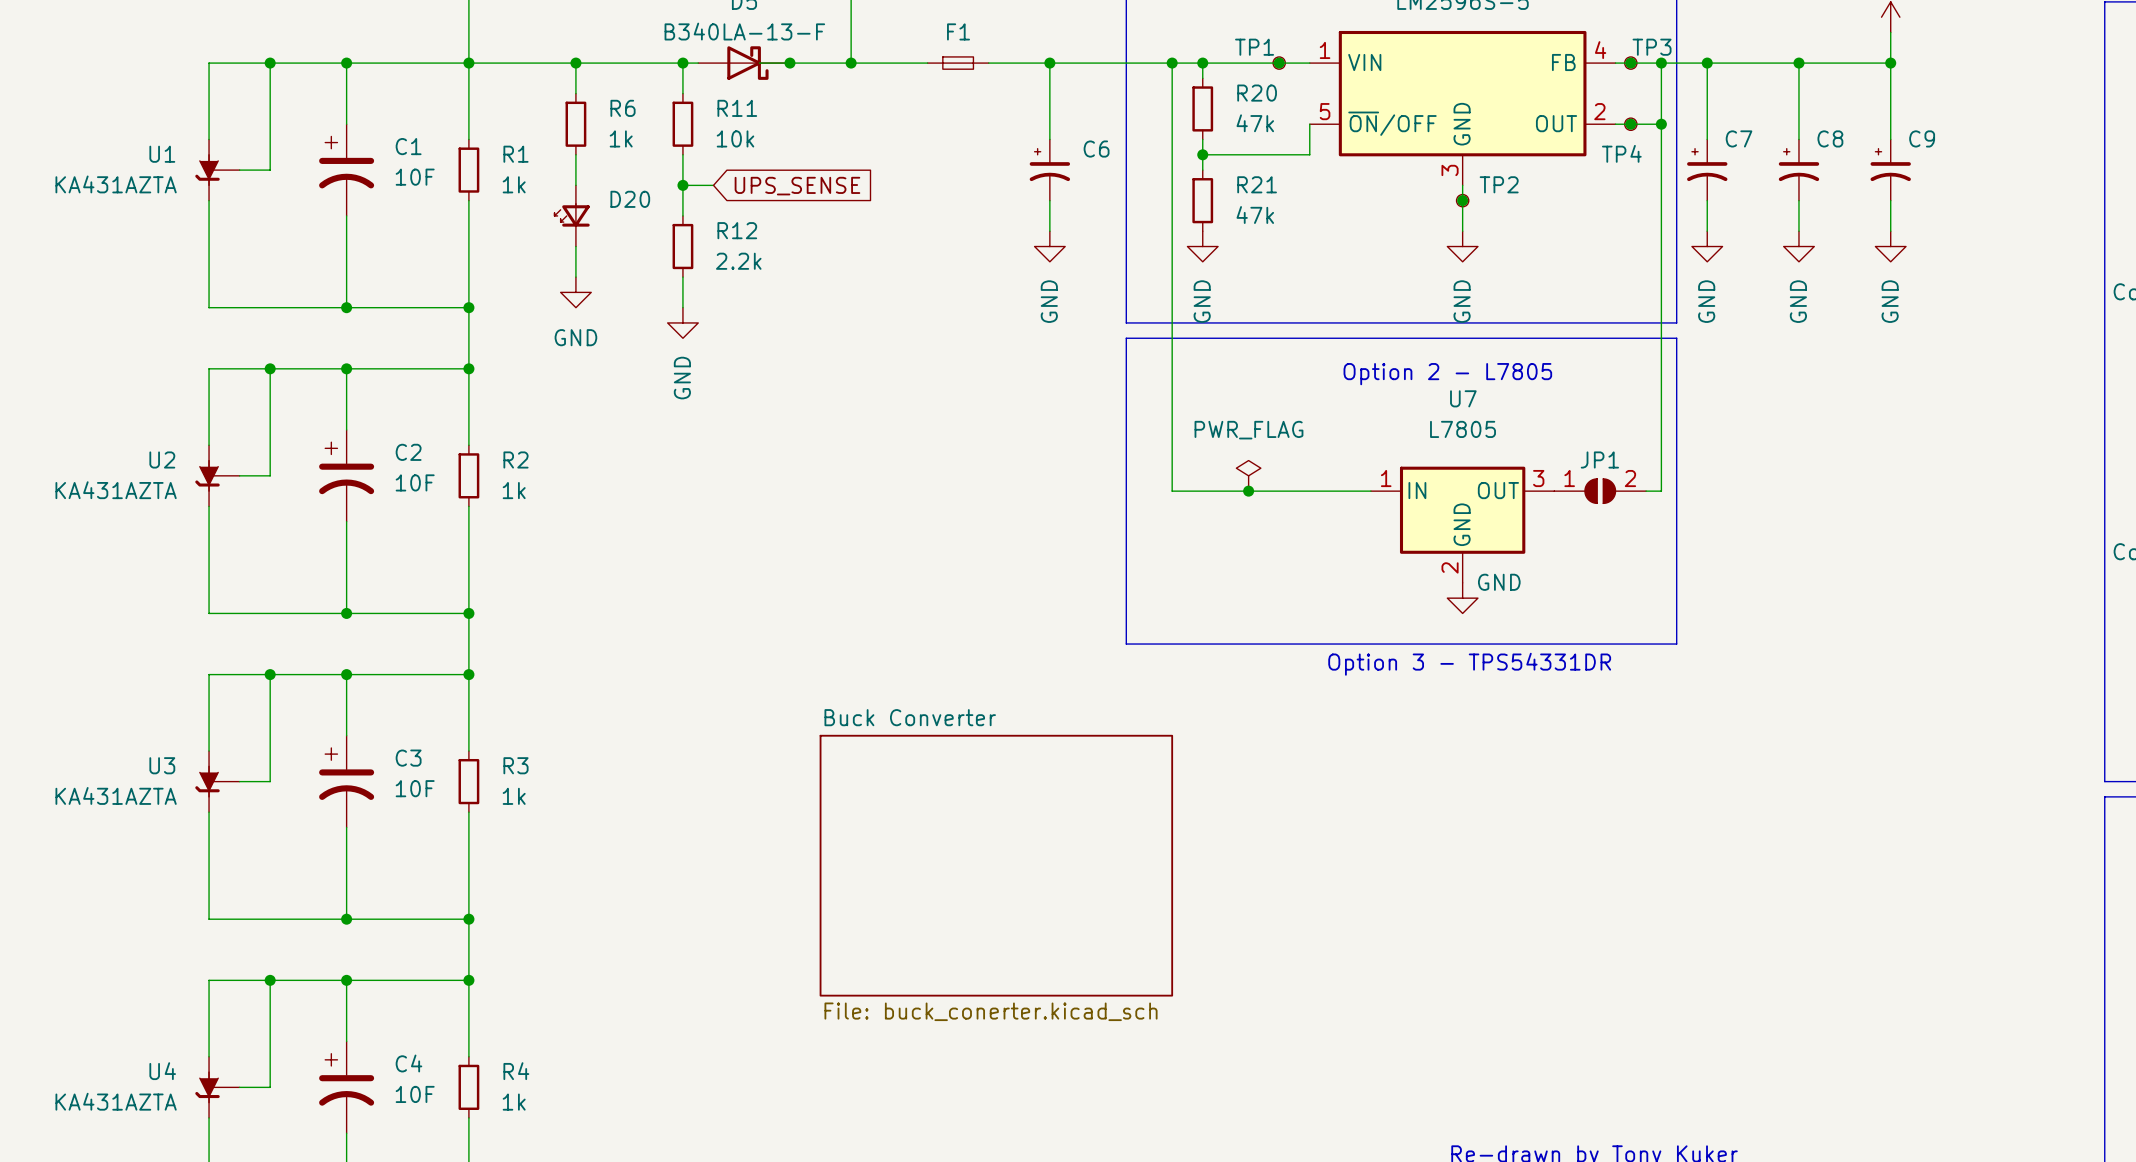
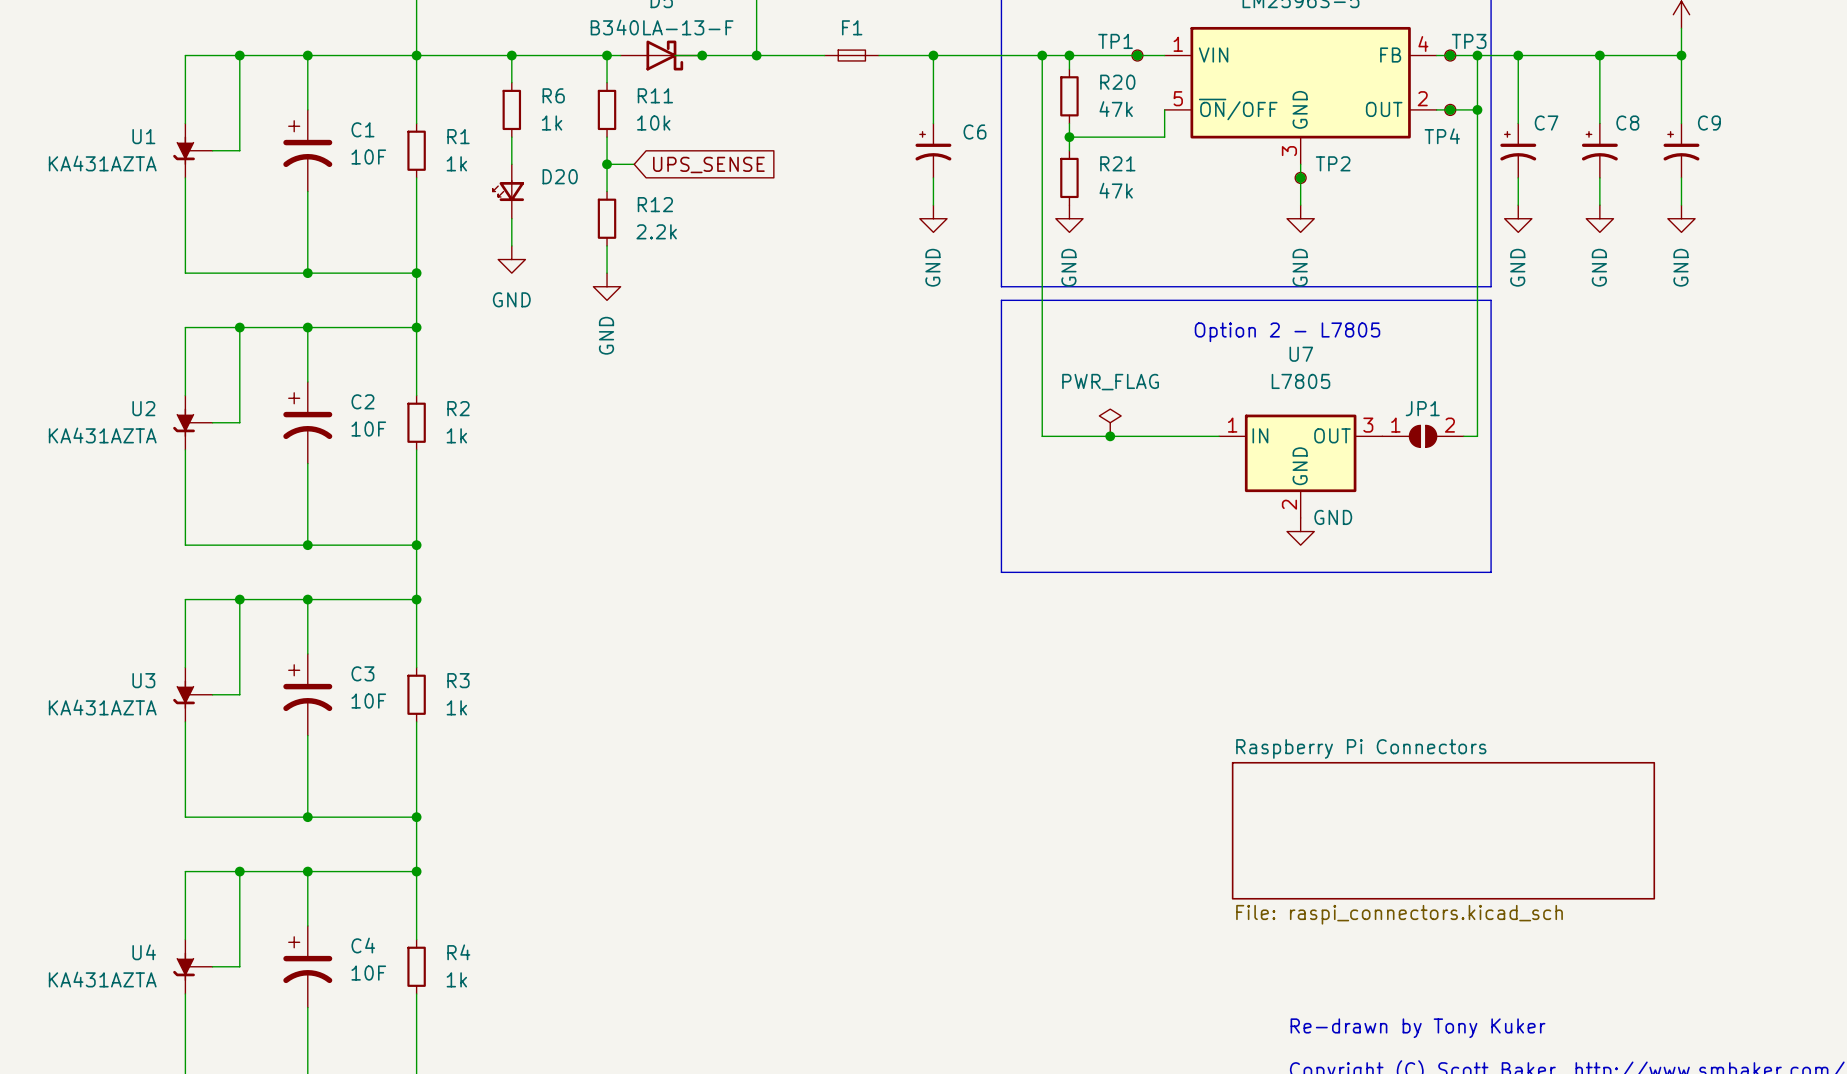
text: Option 3 - TPS54331DR (1469, 664) -> none
sheet Buck Converter: File: buck_conerter.kicad_sch (996, 865) -> none
sheet Raspberry Pi Connectors: none -> File: raspi_connectors.kicad_sch (1443, 830)

